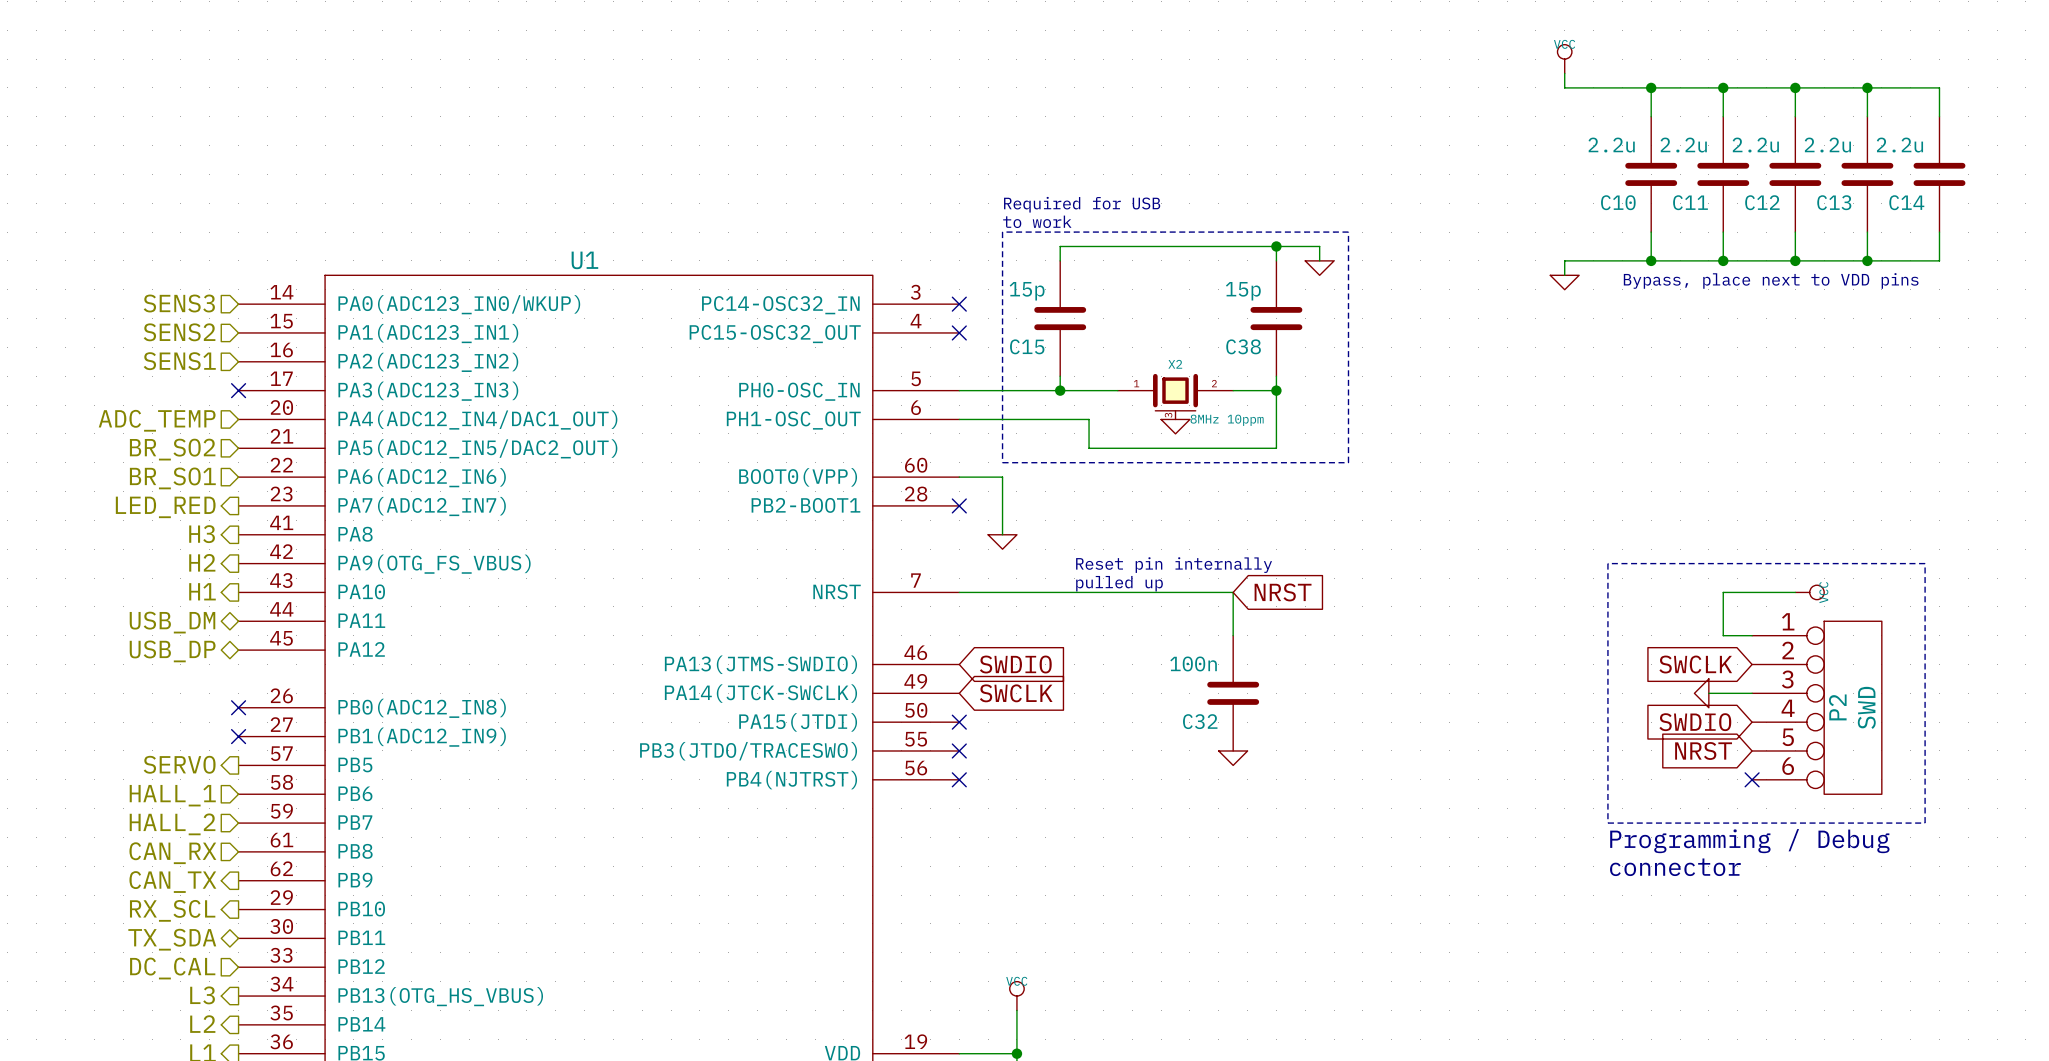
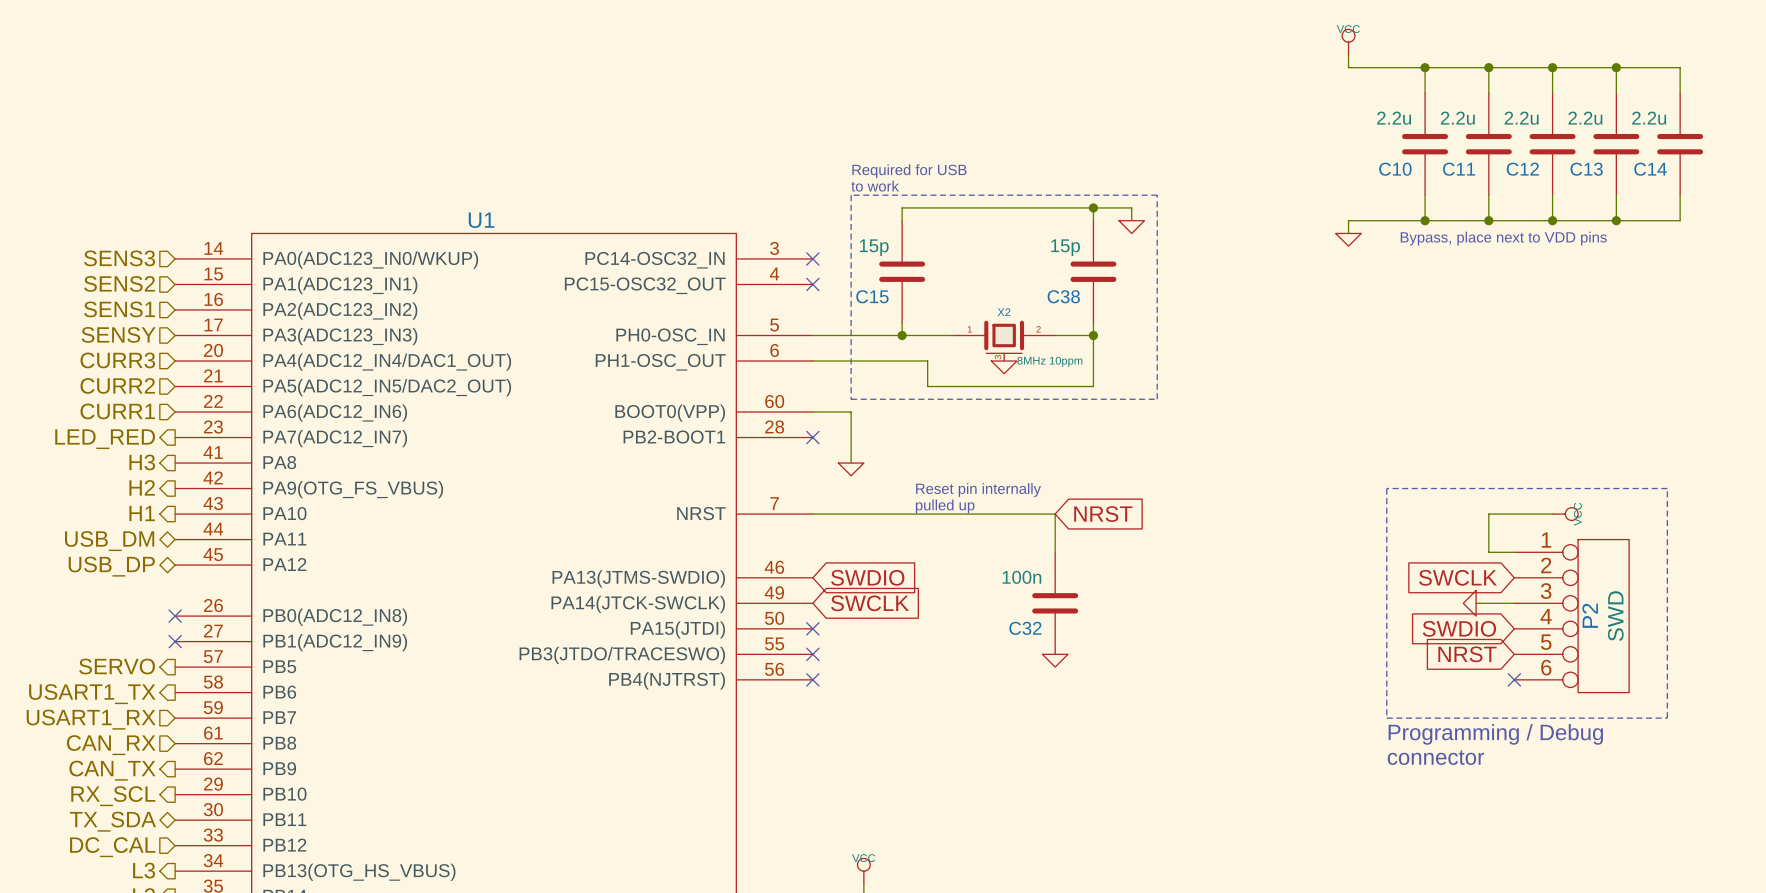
hierarchical label: none -> SENSY (118, 334)
no-connect mark: (238, 390) -> none
hierarchical label: ADC_TEMP (157, 420) -> CURR3 (117, 360)
hierarchical label: BR_SO2 (172, 449) -> CURR2 (117, 385)
hierarchical label: BR_SO1 (172, 478) -> CURR1 (117, 411)
hierarchical label shape: input (172, 795) -> output (92, 694)
hierarchical label: HALL_1 (172, 795) -> USART1_TX (92, 694)
hierarchical label: HALL_2 (172, 824) -> USART1_RX (91, 719)

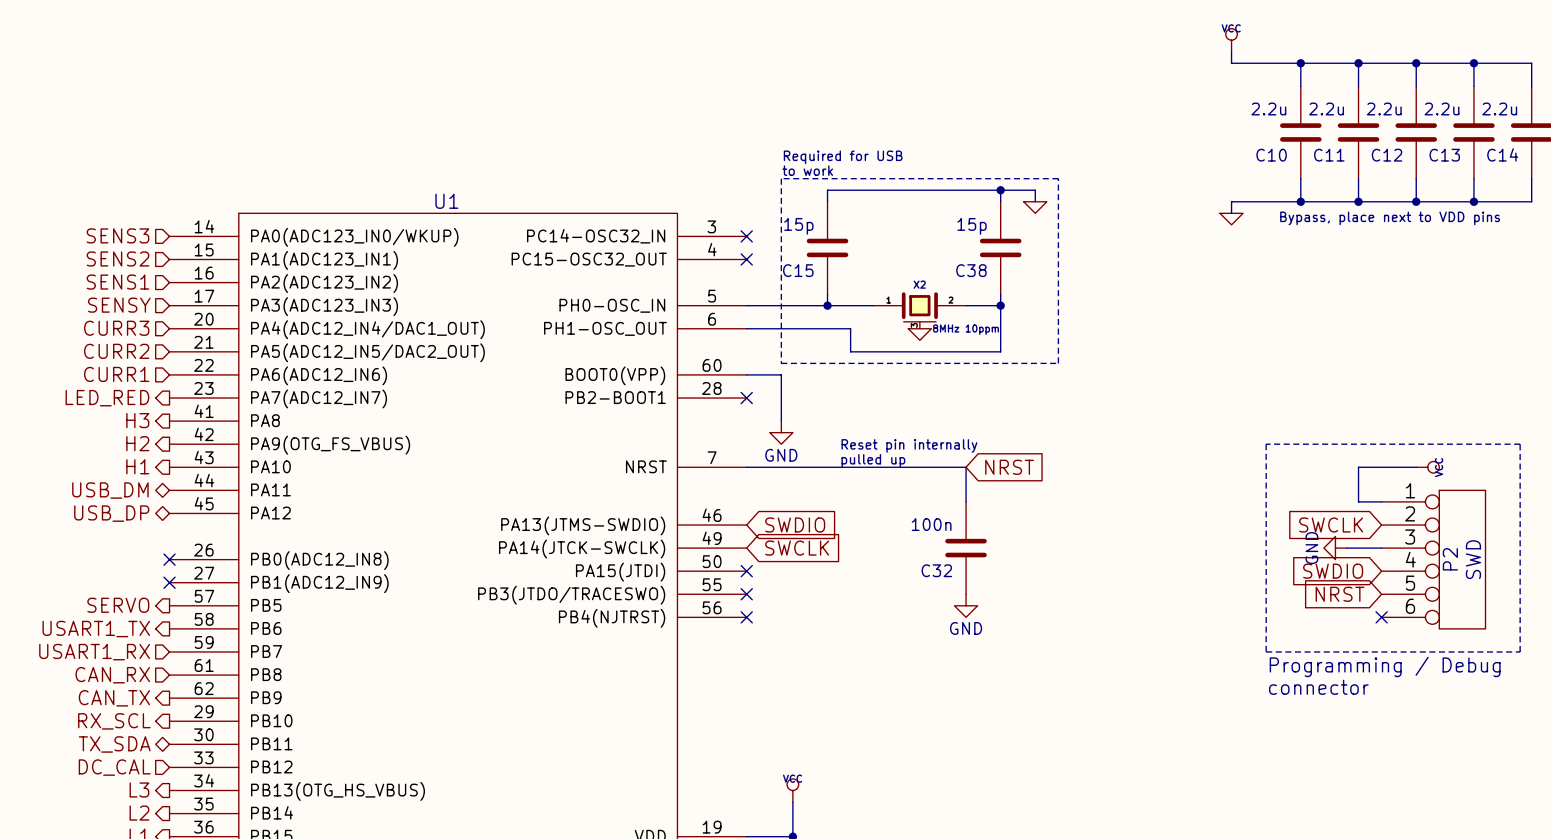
power symbol shape: [838, 463, 864, 476] -> [769, 421, 793, 445]
power symbol text: none -> GND (781, 455)
power symbol shape: [1463, 590, 1477, 617] -> [1323, 536, 1347, 560]
power symbol text: none -> GND (1311, 548)
power symbol shape: [1042, 654, 1068, 668] -> [954, 594, 978, 618]
power symbol text: none -> GND (966, 628)

